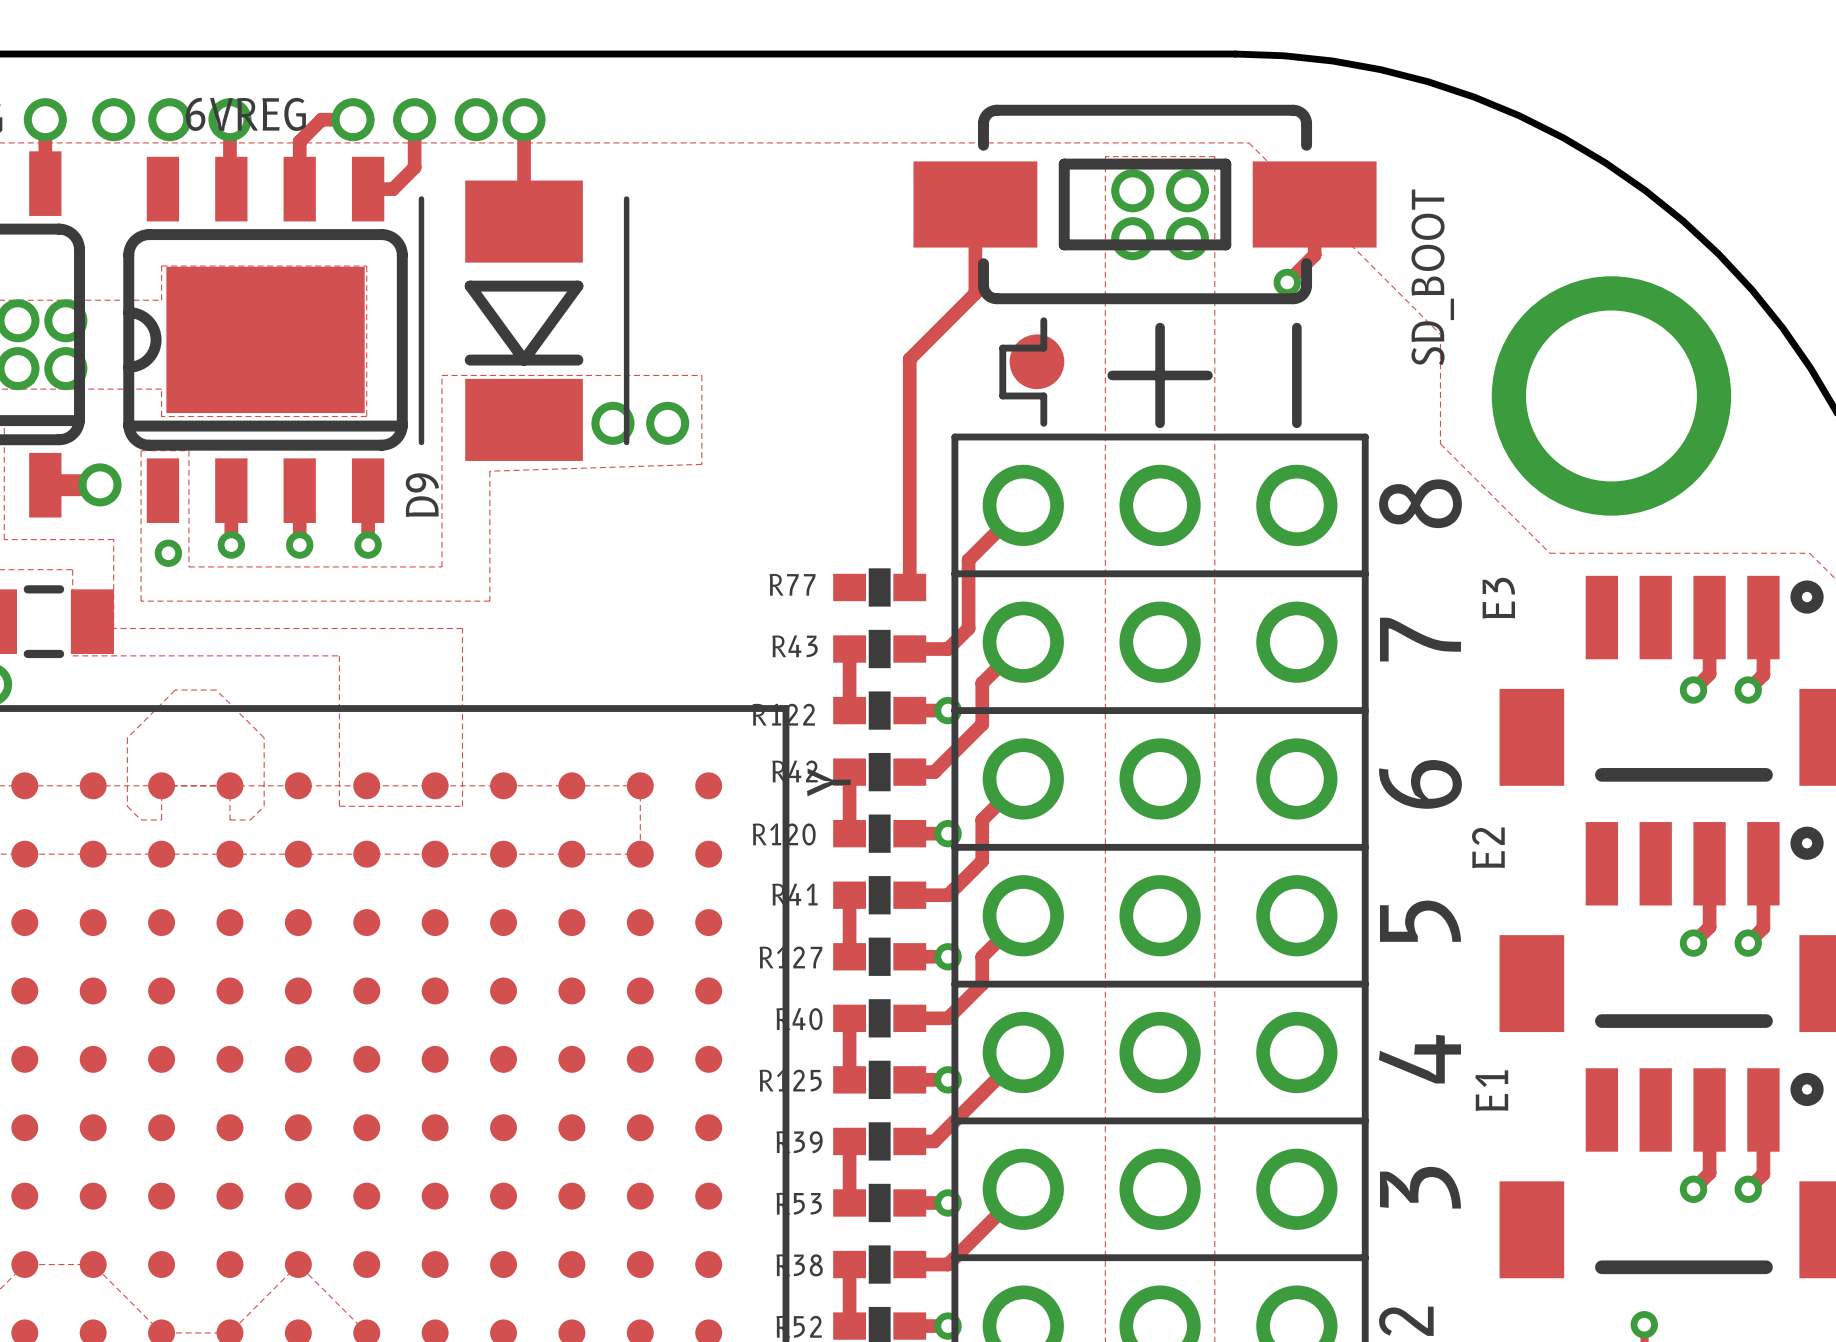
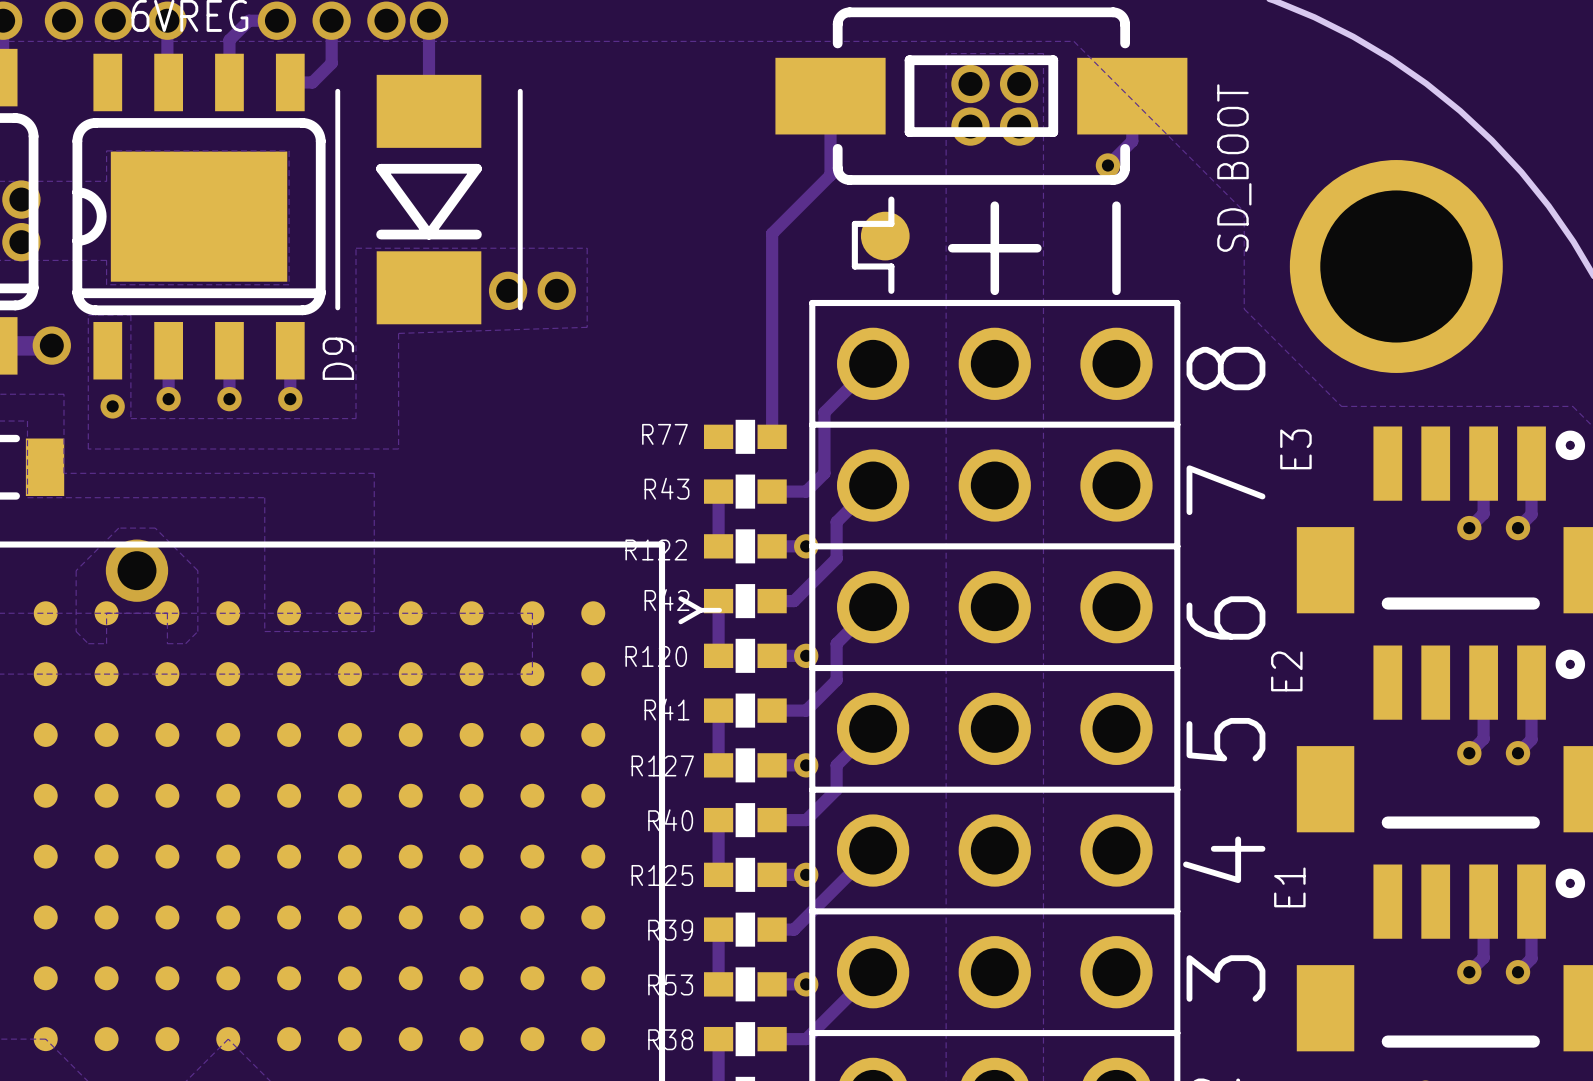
via: none -> (136, 570)

